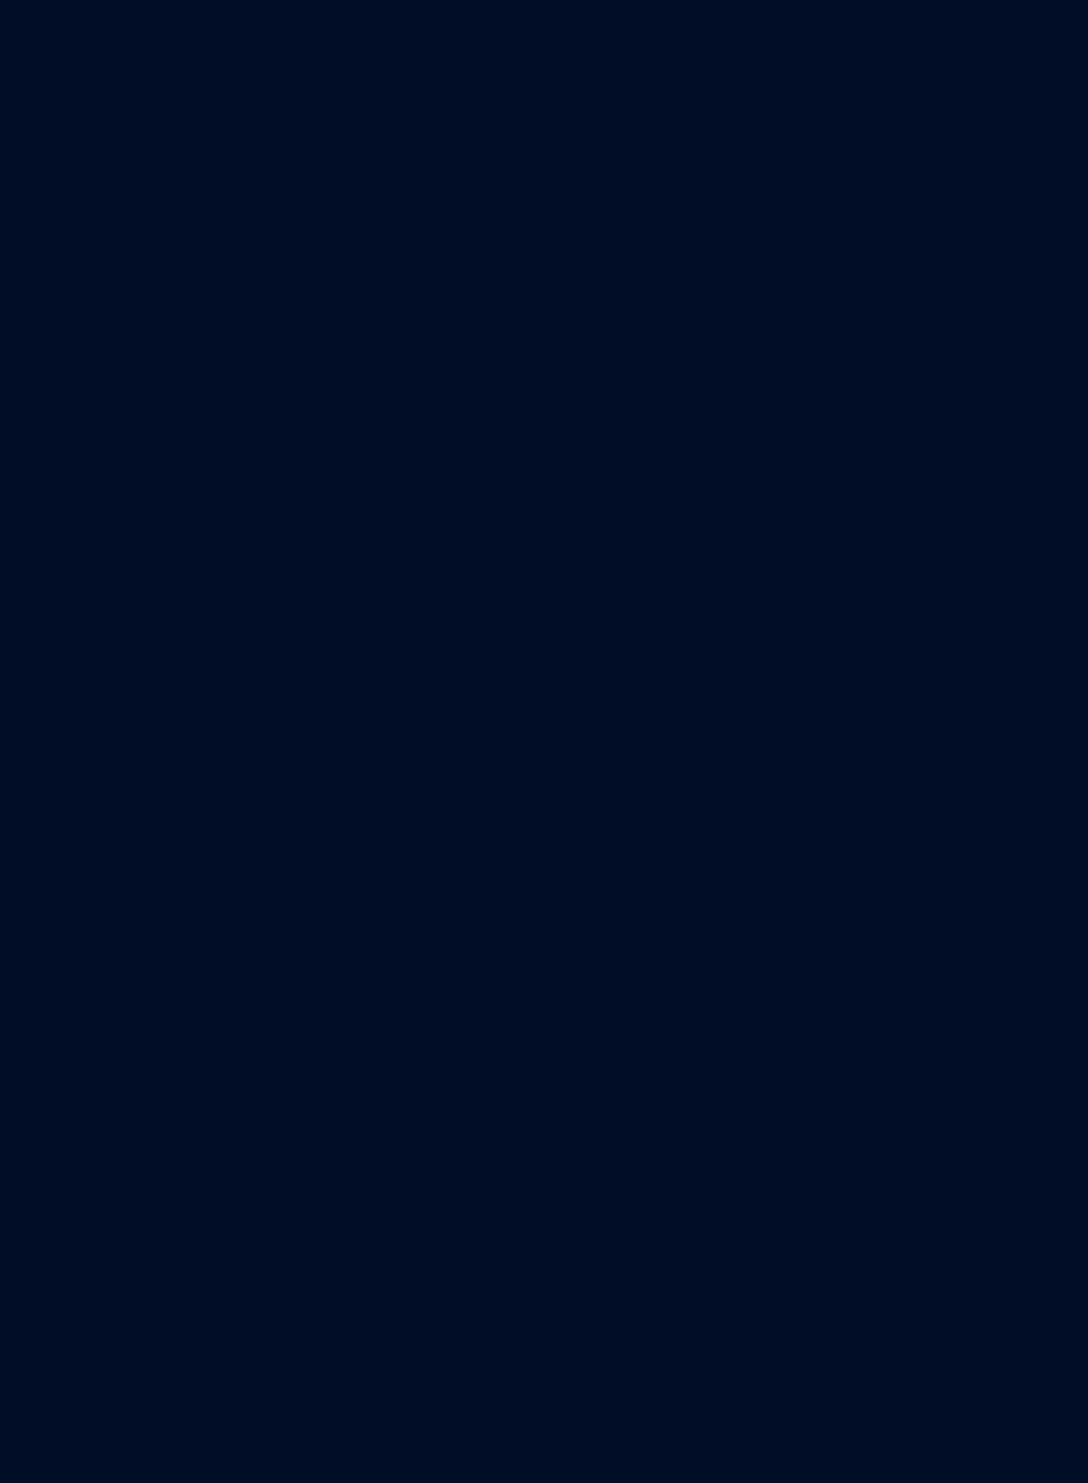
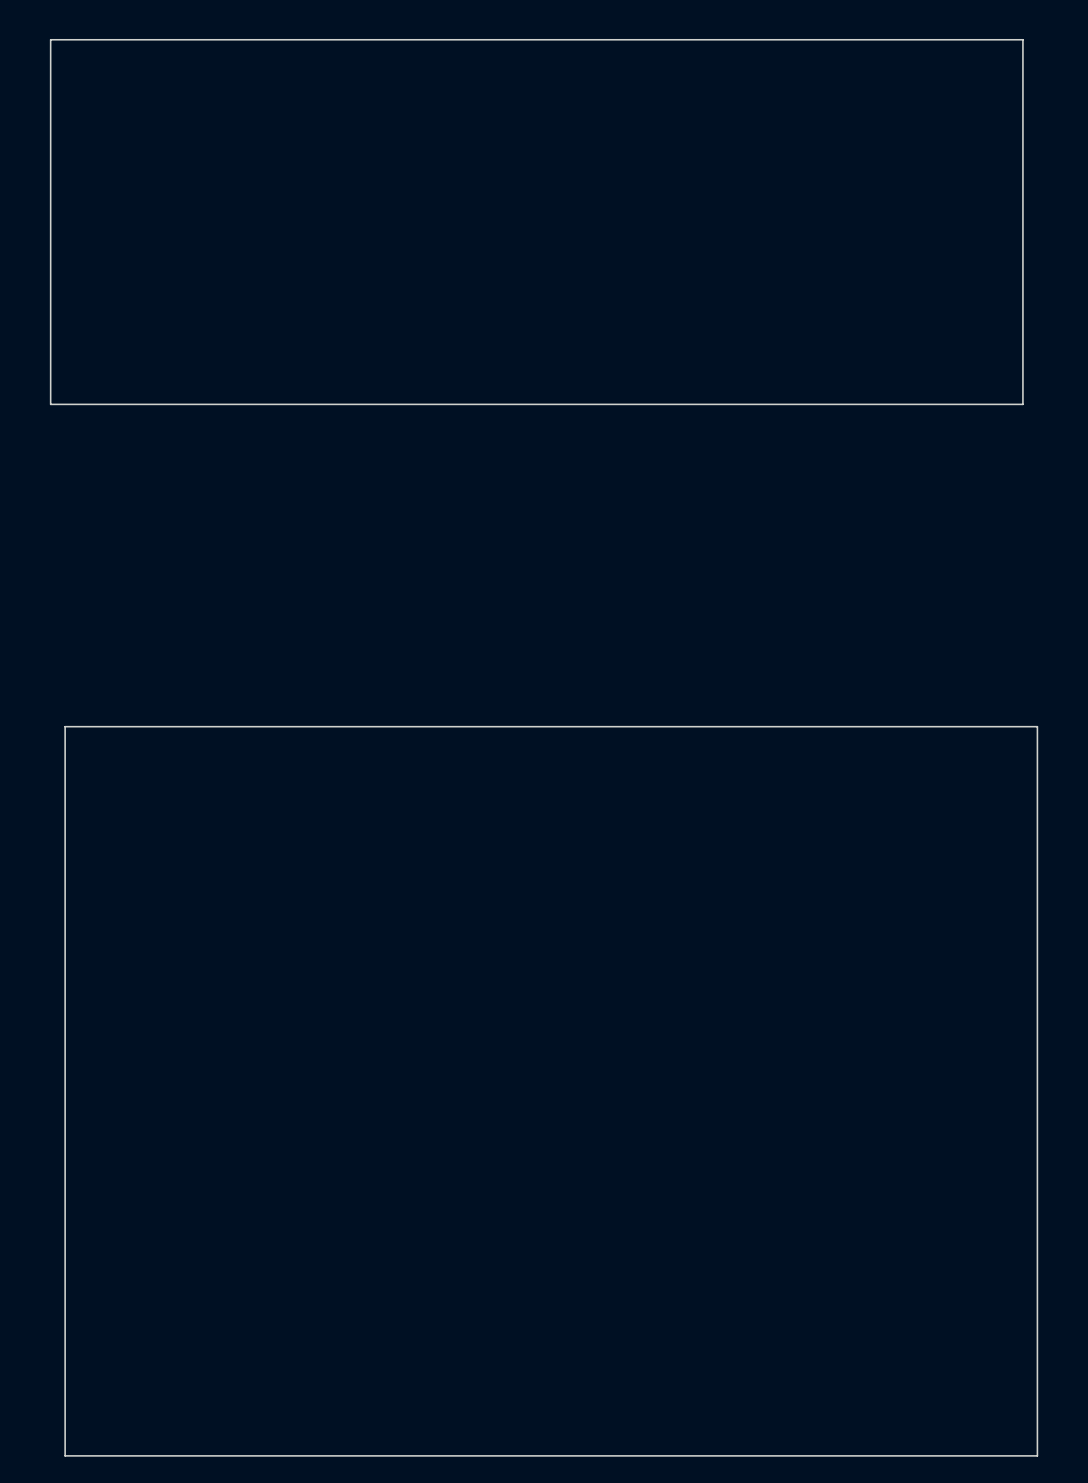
board edge: none -> (50, 39) (1022, 39) (1022, 404) (50, 404) (50, 39)
board edge: none -> (65, 726) (1037, 726) (1037, 1455) (65, 1455) (65, 726)

